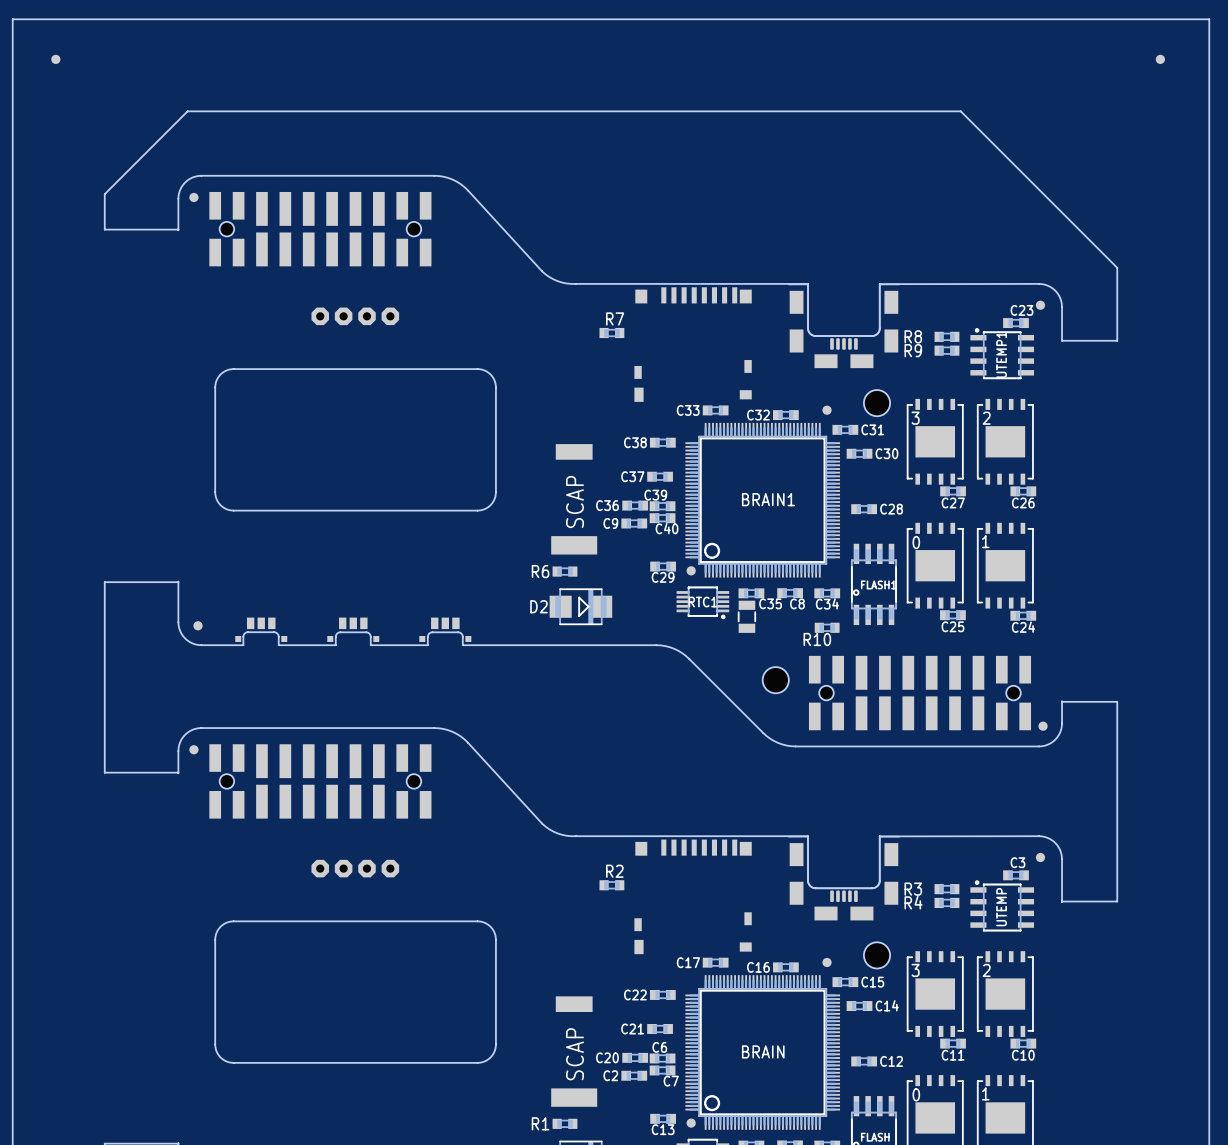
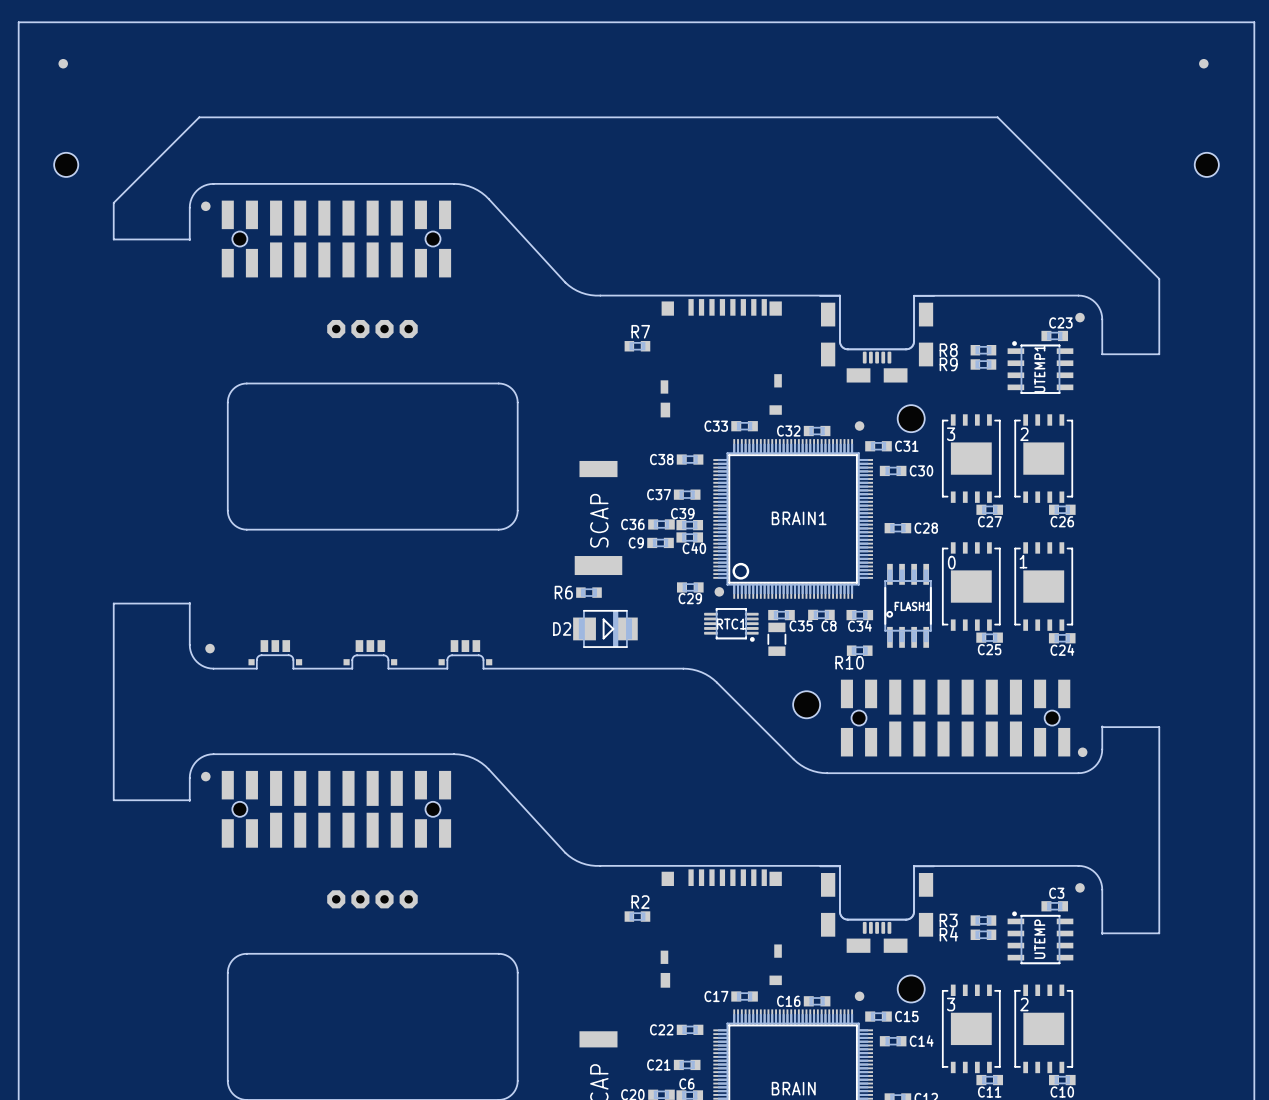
hole: none -> (66, 164)
hole: none -> (1206, 164)

